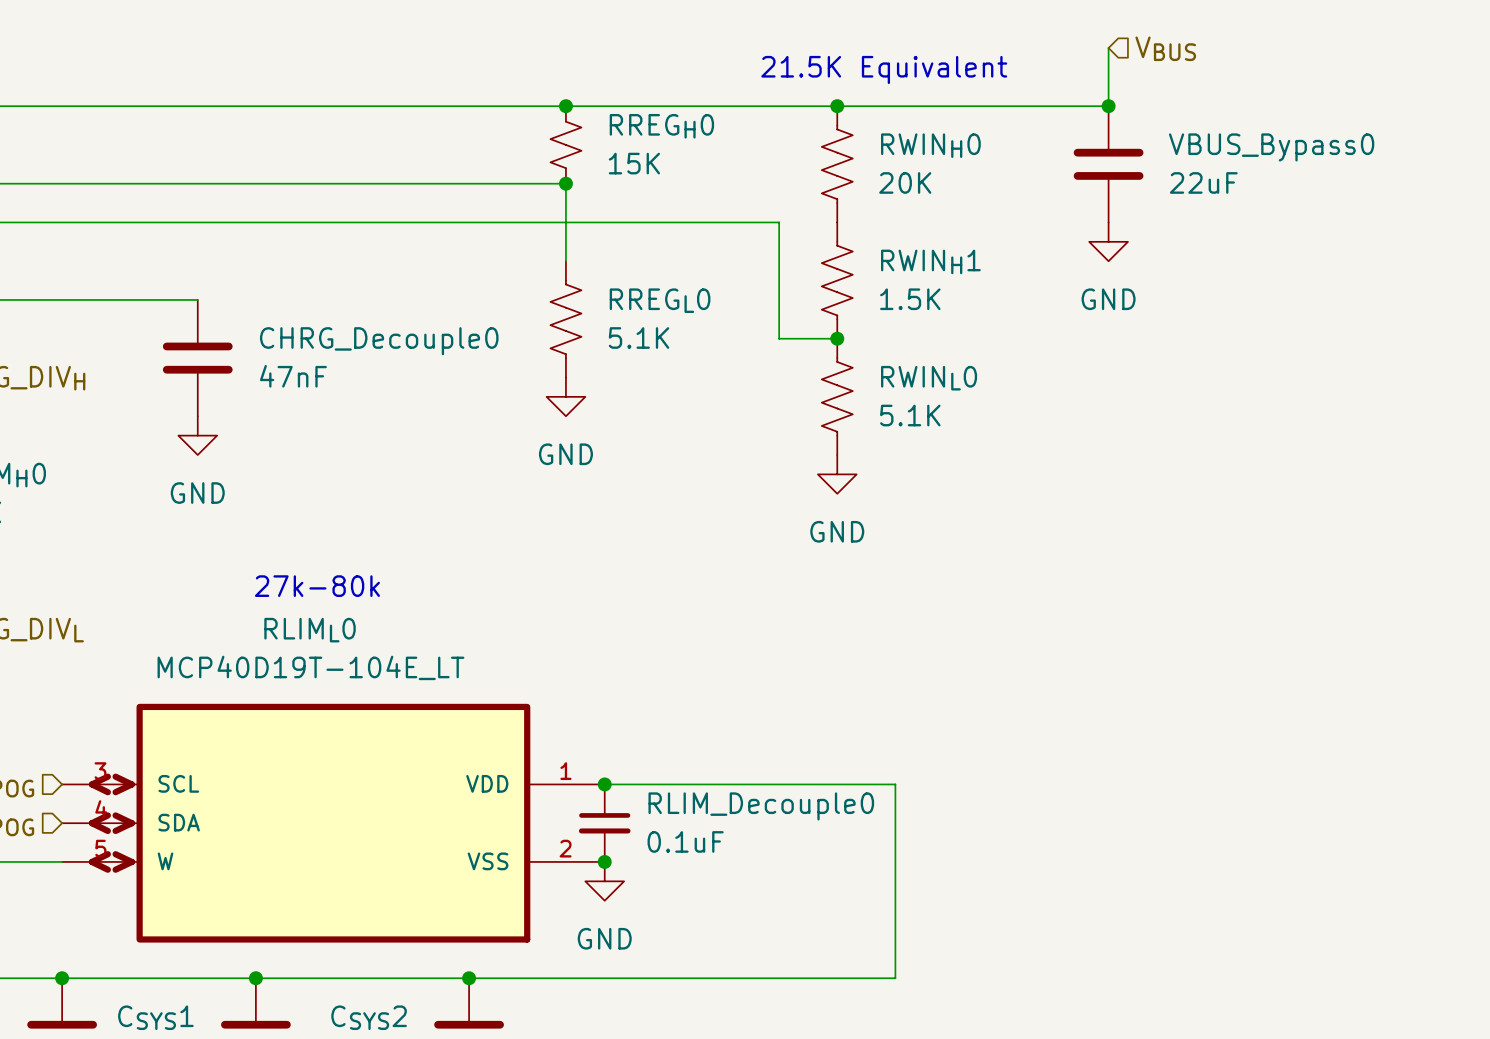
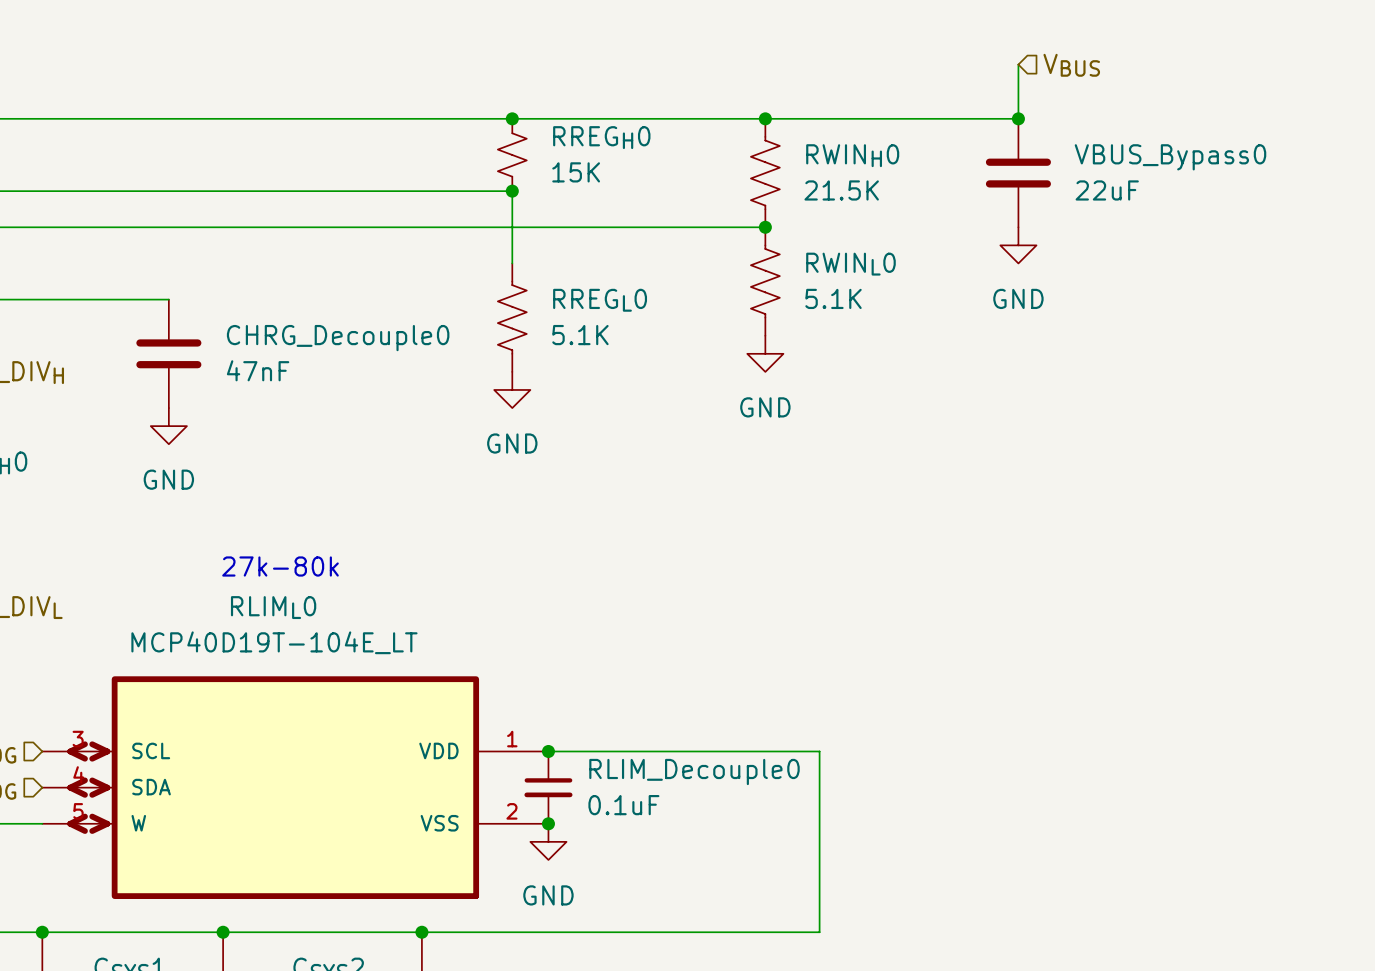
text: 21.5K Equivalent (884, 69) -> none
RWINH0 value: 20K (905, 182) -> 21.5K (841, 190)
wire: (779, 222) (779, 338) (837, 338) -> (711, 227) (765, 227)
junction: none -> (765, 227)
RWINH1 name: RWINH1 (930, 261) -> RWINL0 (850, 264)
RWINH1 value: 1.5K (910, 299) -> 5.1K (833, 298)
junction: (837, 338) -> none
RWINL0: 5.1K (837, 396) -> none
power symbol position: GND (837, 474) -> GND (765, 353)

